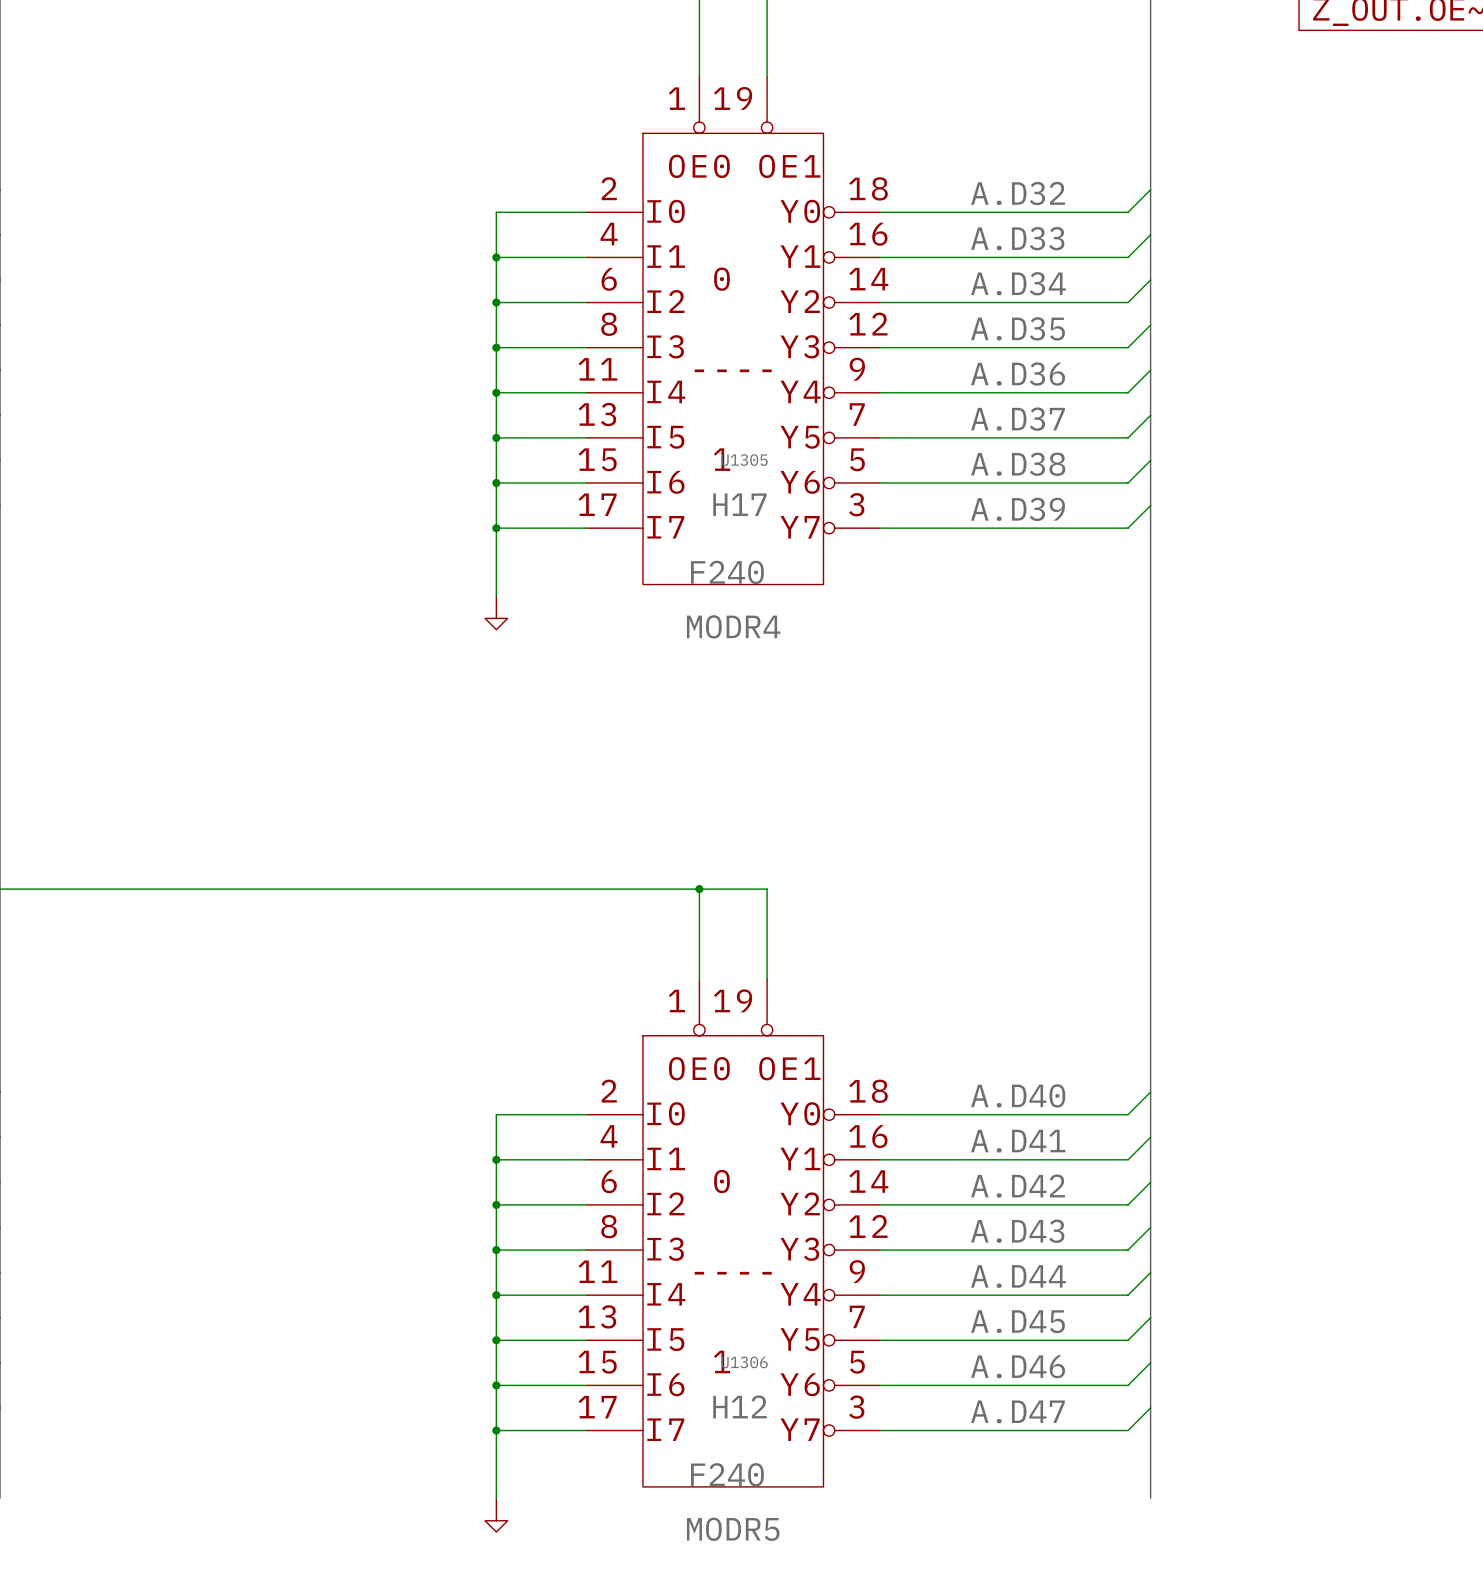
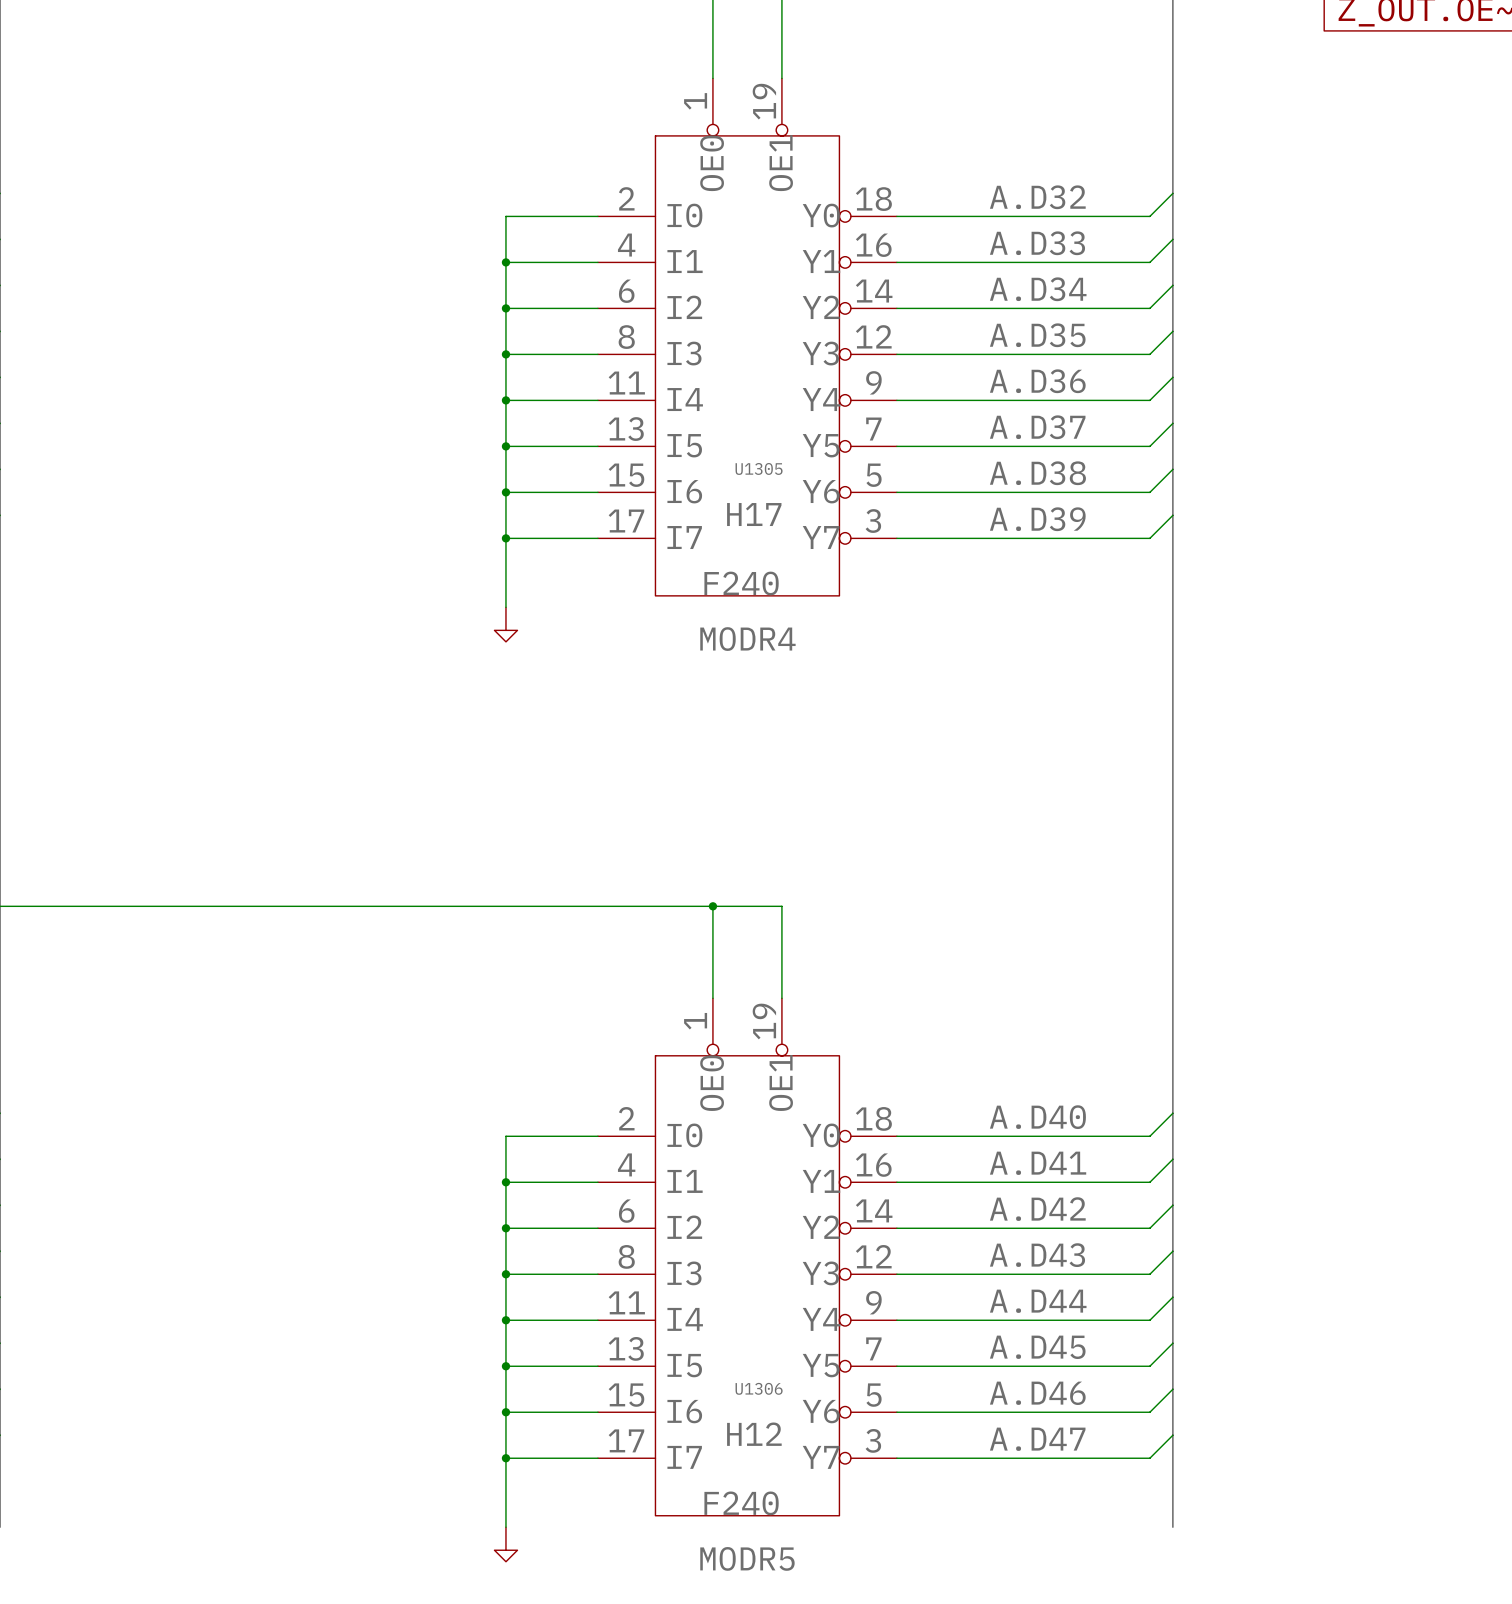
U1305 symbol: [586, 76, 880, 585] -> [597, 78, 897, 596]
U1306 symbol: [586, 979, 880, 1487] -> [597, 998, 897, 1516]

